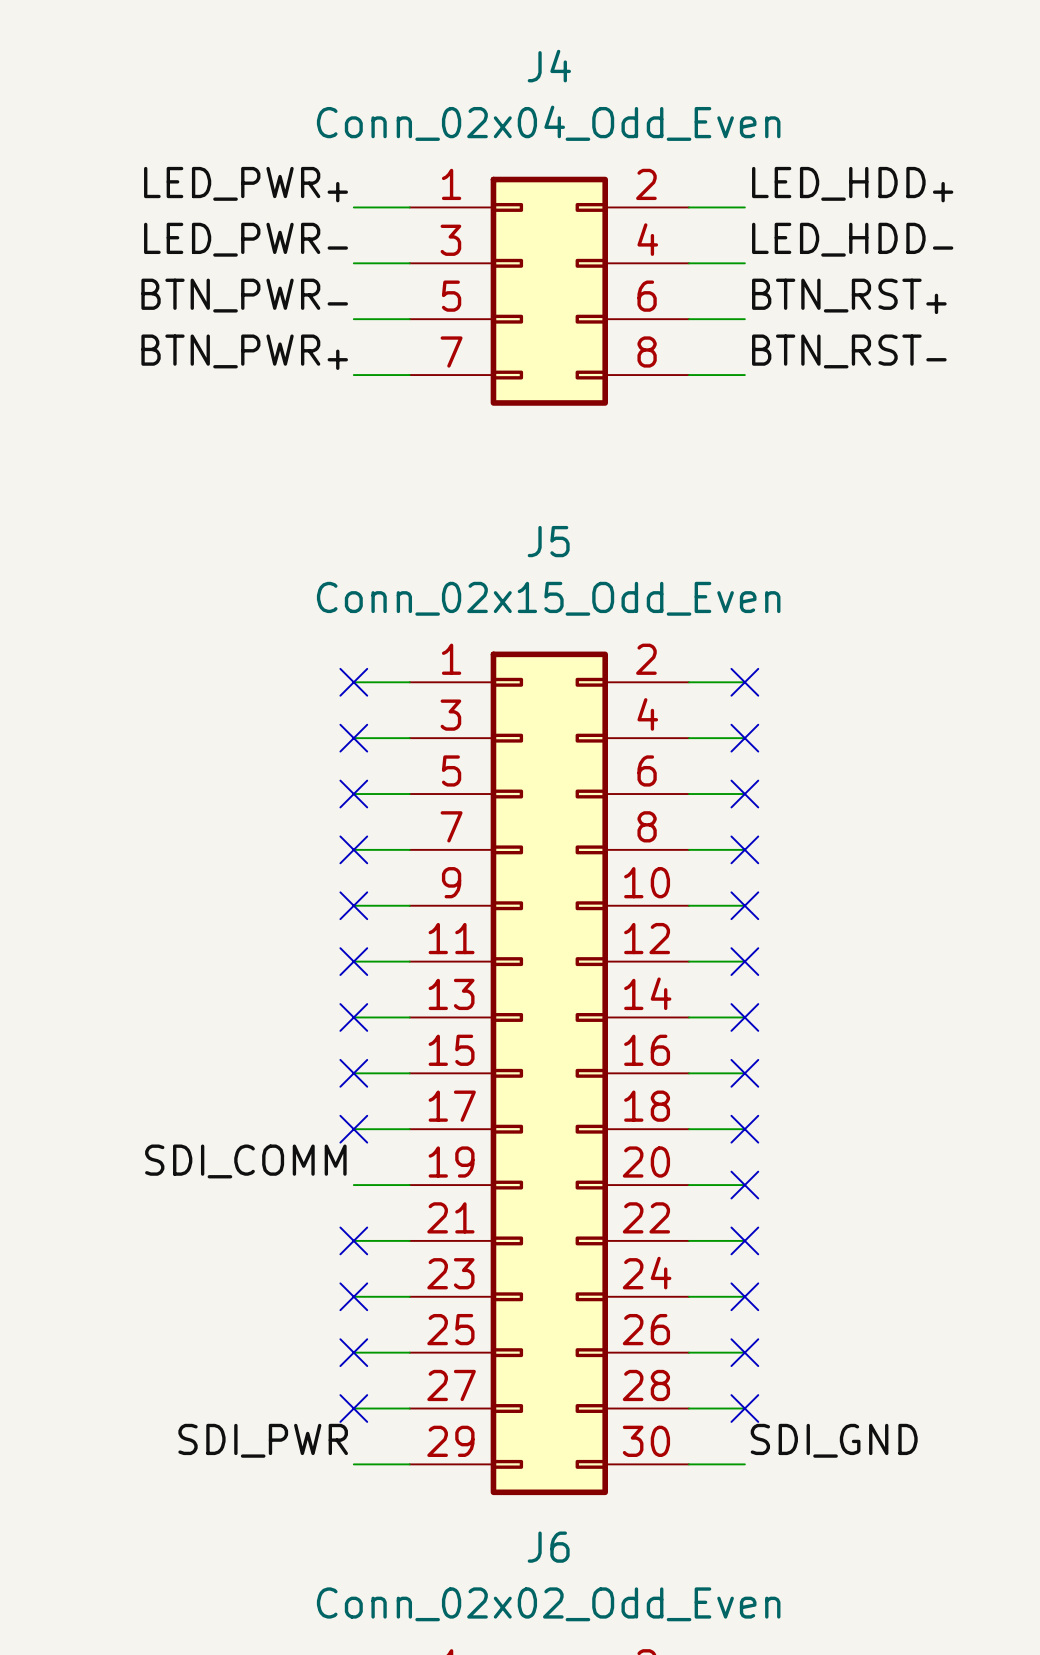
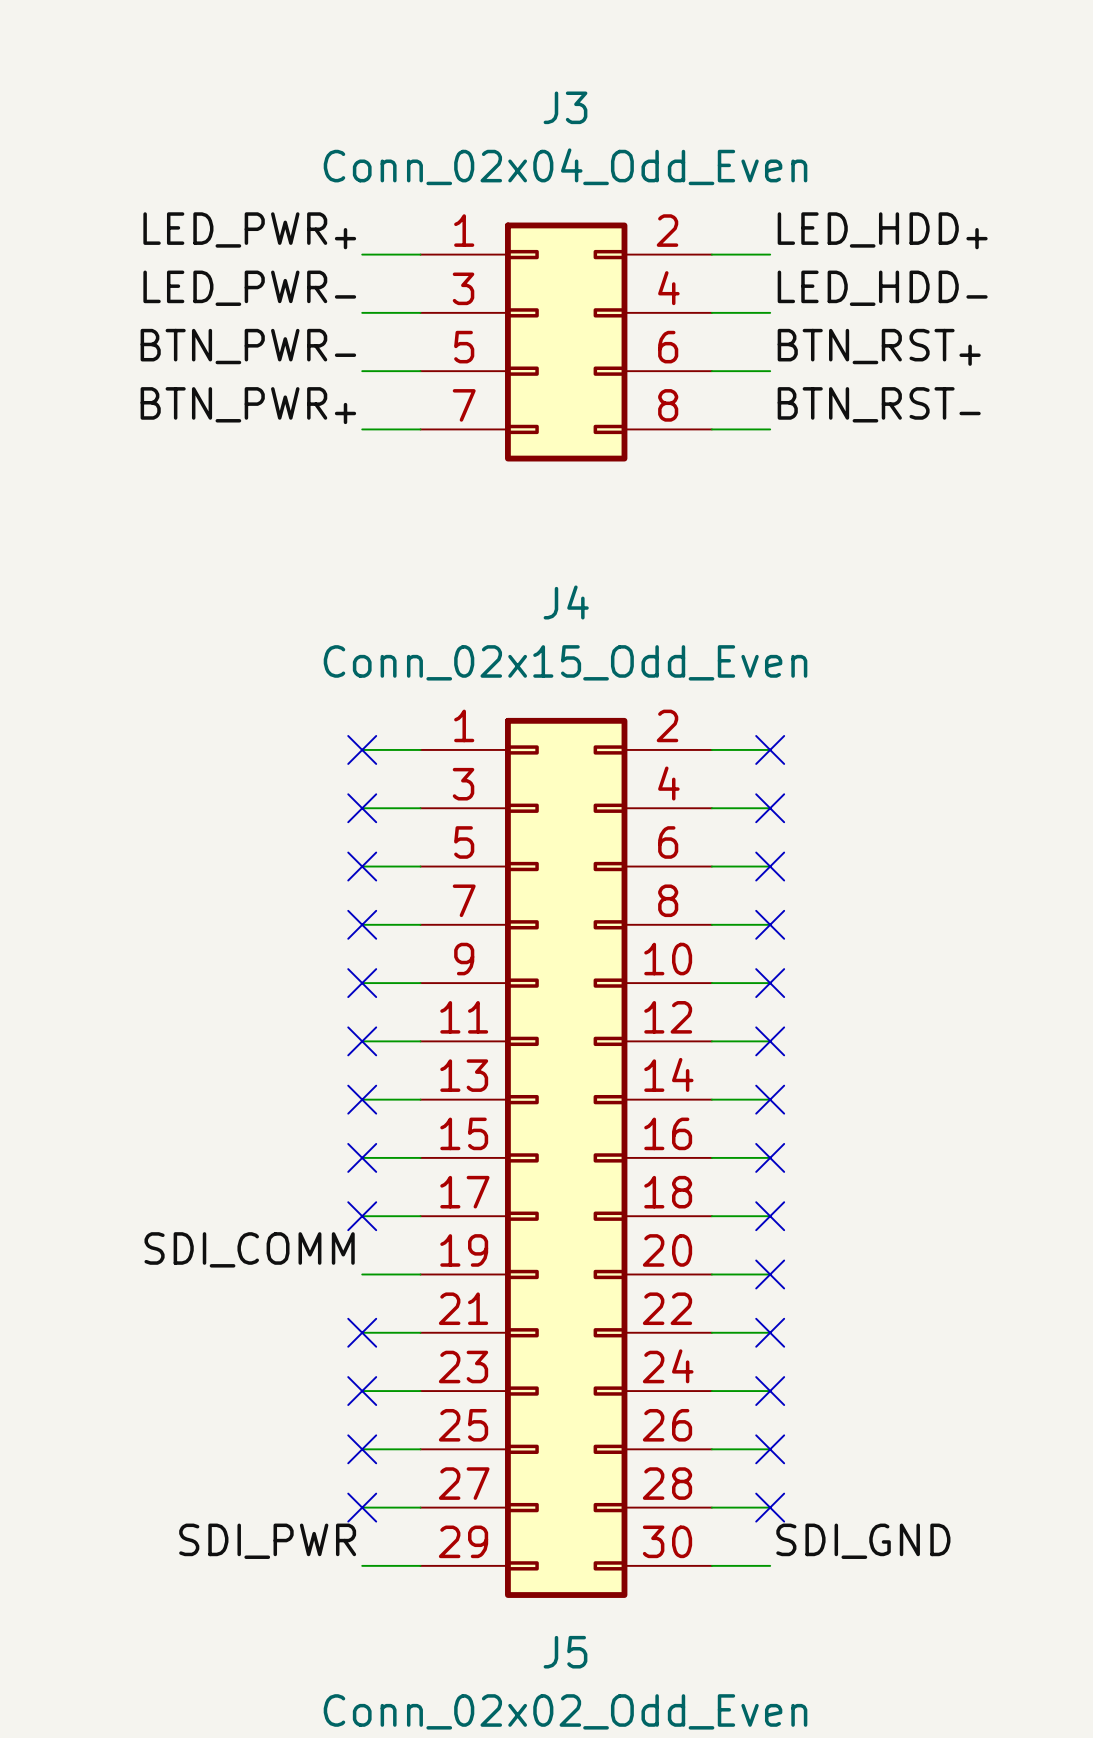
J4 name: J4 (549, 66) -> J3 (565, 107)
J5 name: J5 (548, 541) -> J4 (566, 602)
J6 name: J6 (548, 1547) -> J5 (565, 1652)

